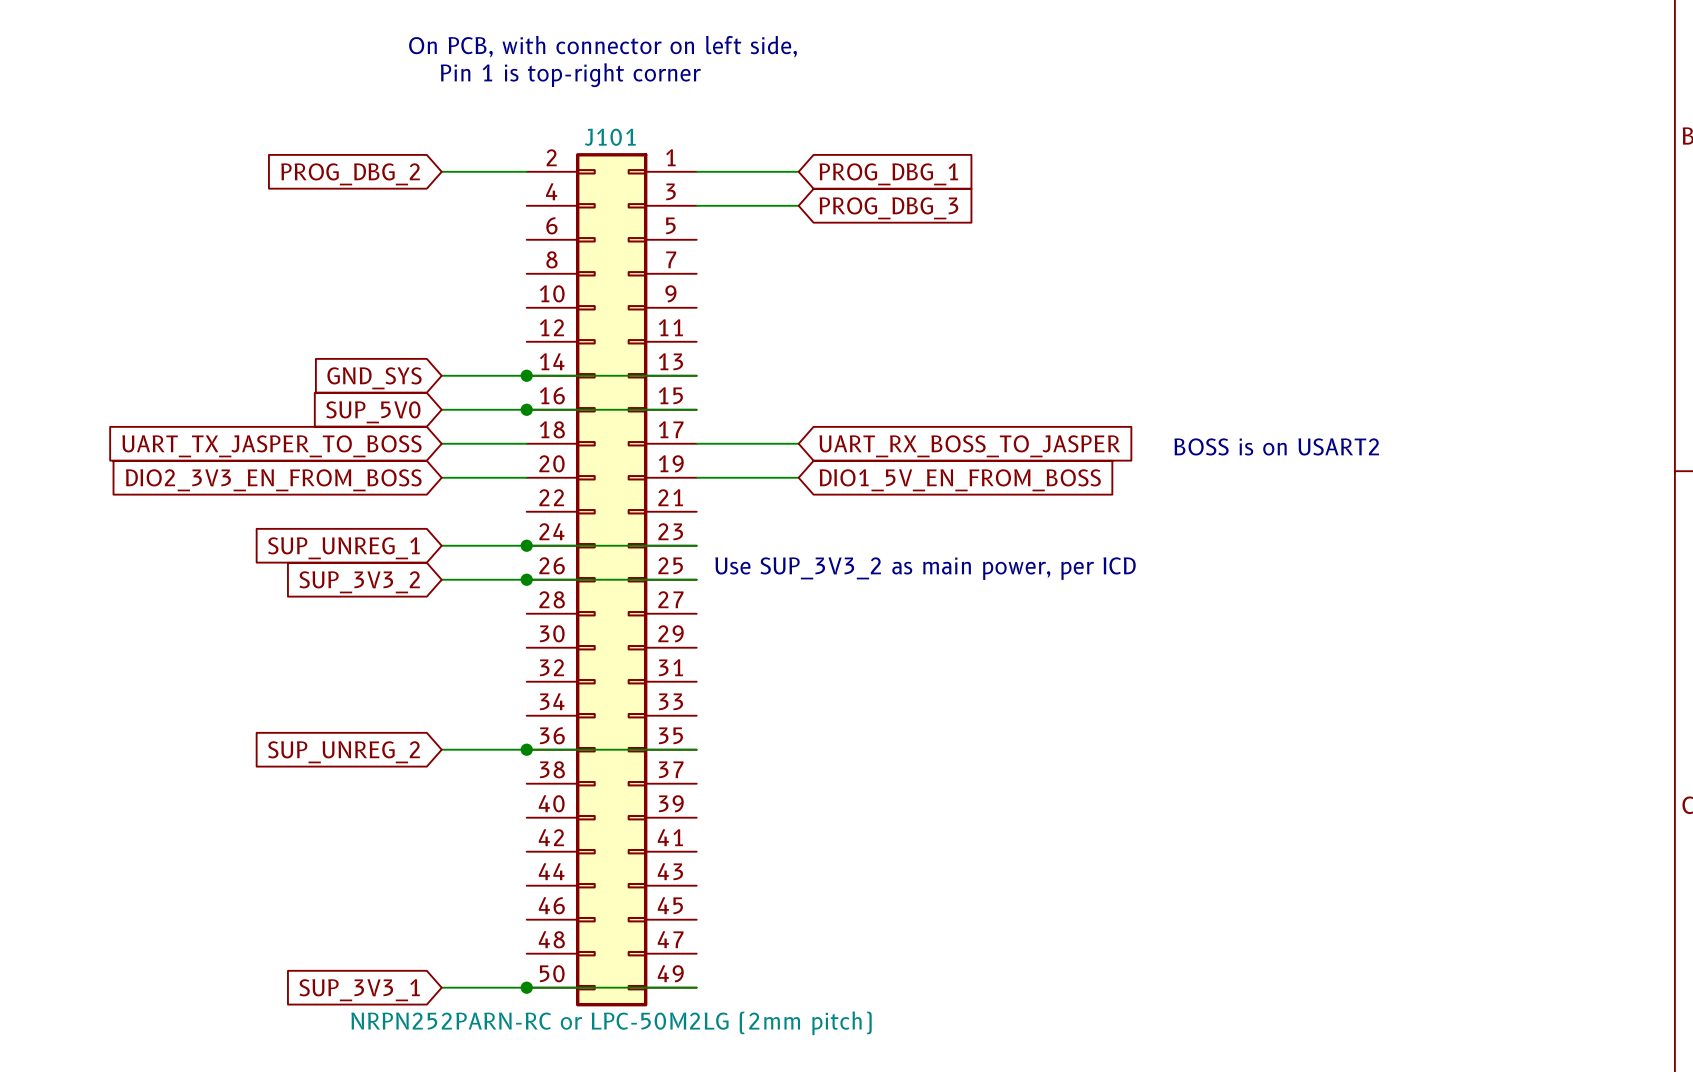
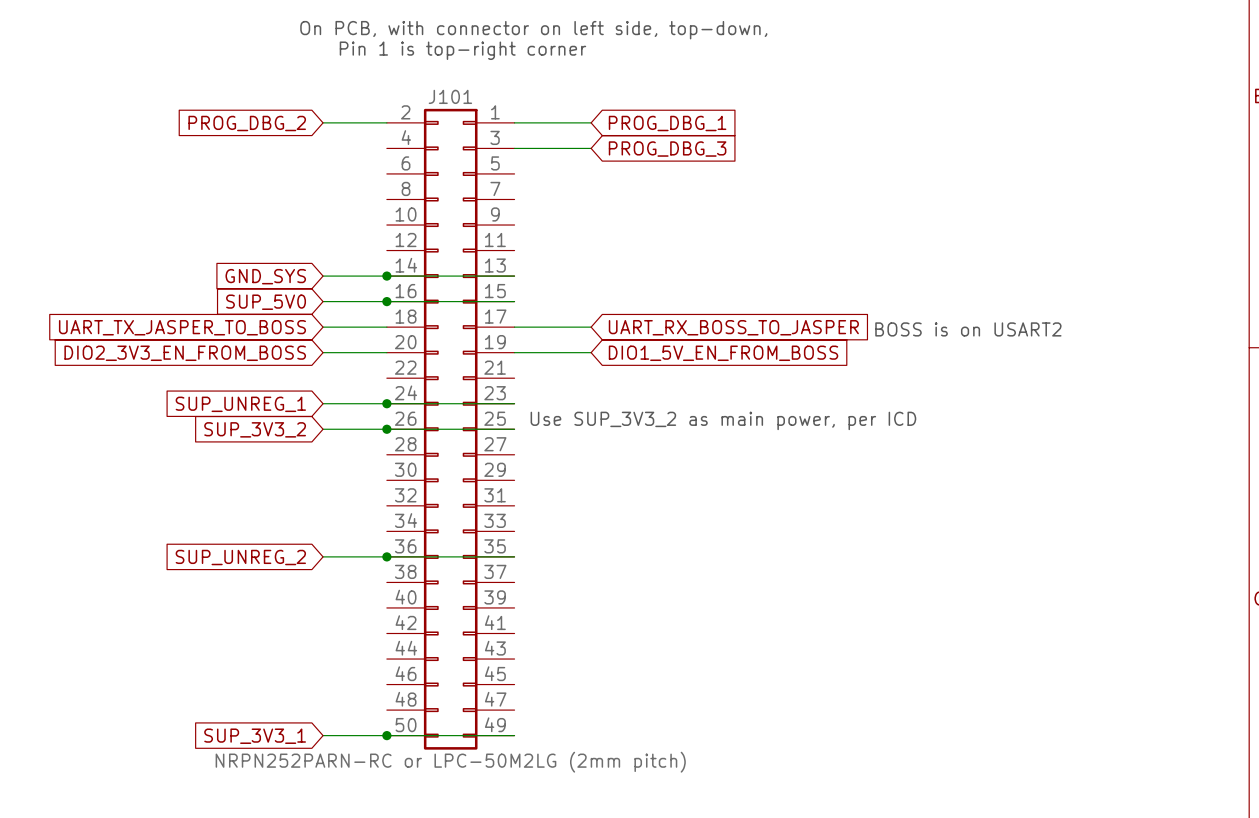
text: On PCB, with connector on left side, (602, 46) -> On PCB, with connector on left side, top-down, (533, 30)

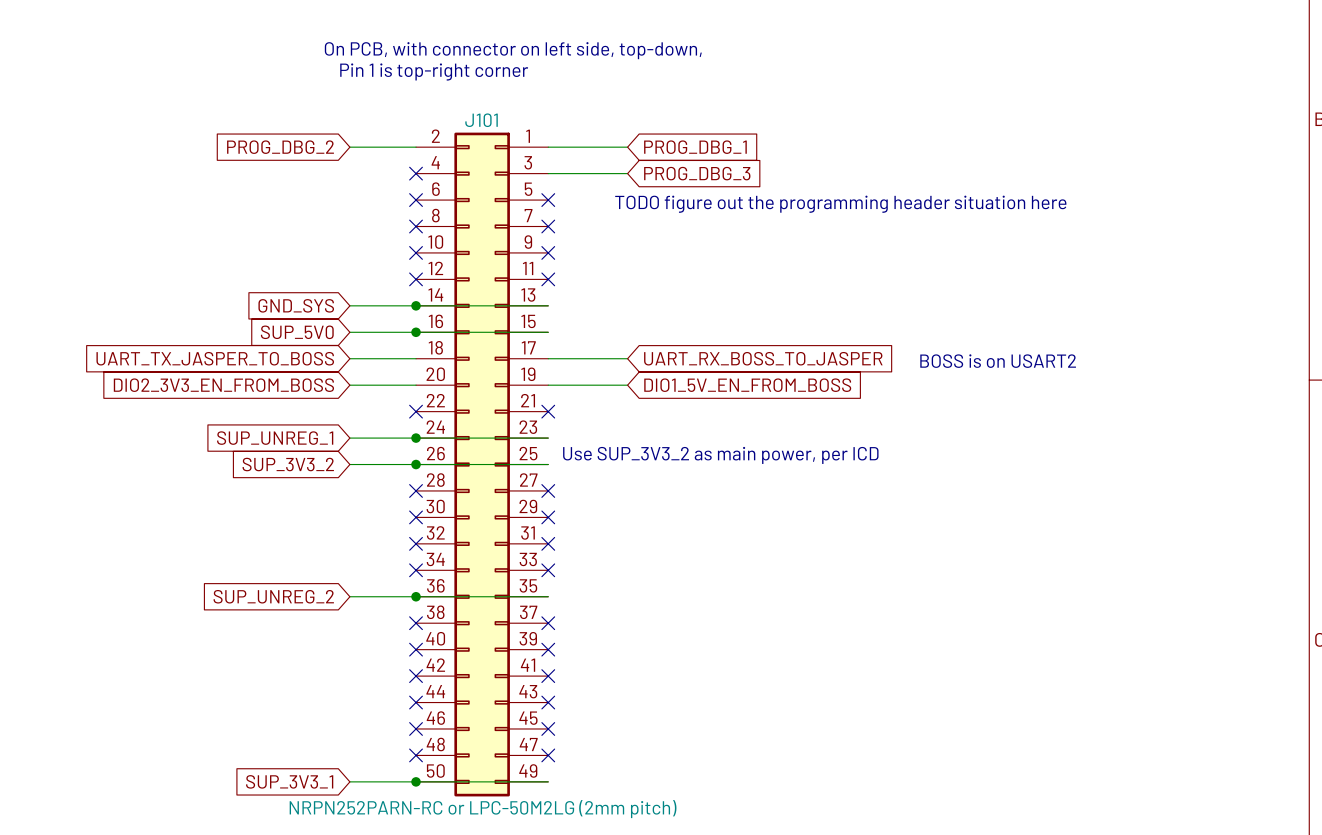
no-connect mark: none -> (416, 173)
no-connect mark: none -> (416, 200)
no-connect mark: none -> (548, 200)
text: none -> TODO figure out the programming header situation here (840, 204)
no-connect mark: none -> (416, 226)
no-connect mark: none -> (548, 226)
no-connect mark: none -> (416, 252)
no-connect mark: none -> (548, 252)
no-connect mark: none -> (416, 279)
no-connect mark: none -> (548, 279)
no-connect mark: none -> (416, 411)
no-connect mark: none -> (548, 411)
no-connect mark: none -> (416, 490)
no-connect mark: none -> (548, 490)
no-connect mark: none -> (416, 517)
no-connect mark: none -> (548, 517)
no-connect mark: none -> (416, 543)
no-connect mark: none -> (548, 543)
no-connect mark: none -> (416, 570)
no-connect mark: none -> (548, 570)
no-connect mark: none -> (416, 623)
no-connect mark: none -> (548, 623)
no-connect mark: none -> (416, 649)
no-connect mark: none -> (548, 649)
no-connect mark: none -> (416, 676)
no-connect mark: none -> (548, 676)
no-connect mark: none -> (416, 702)
no-connect mark: none -> (548, 702)
no-connect mark: none -> (416, 728)
no-connect mark: none -> (548, 728)
no-connect mark: none -> (416, 755)
no-connect mark: none -> (548, 755)

